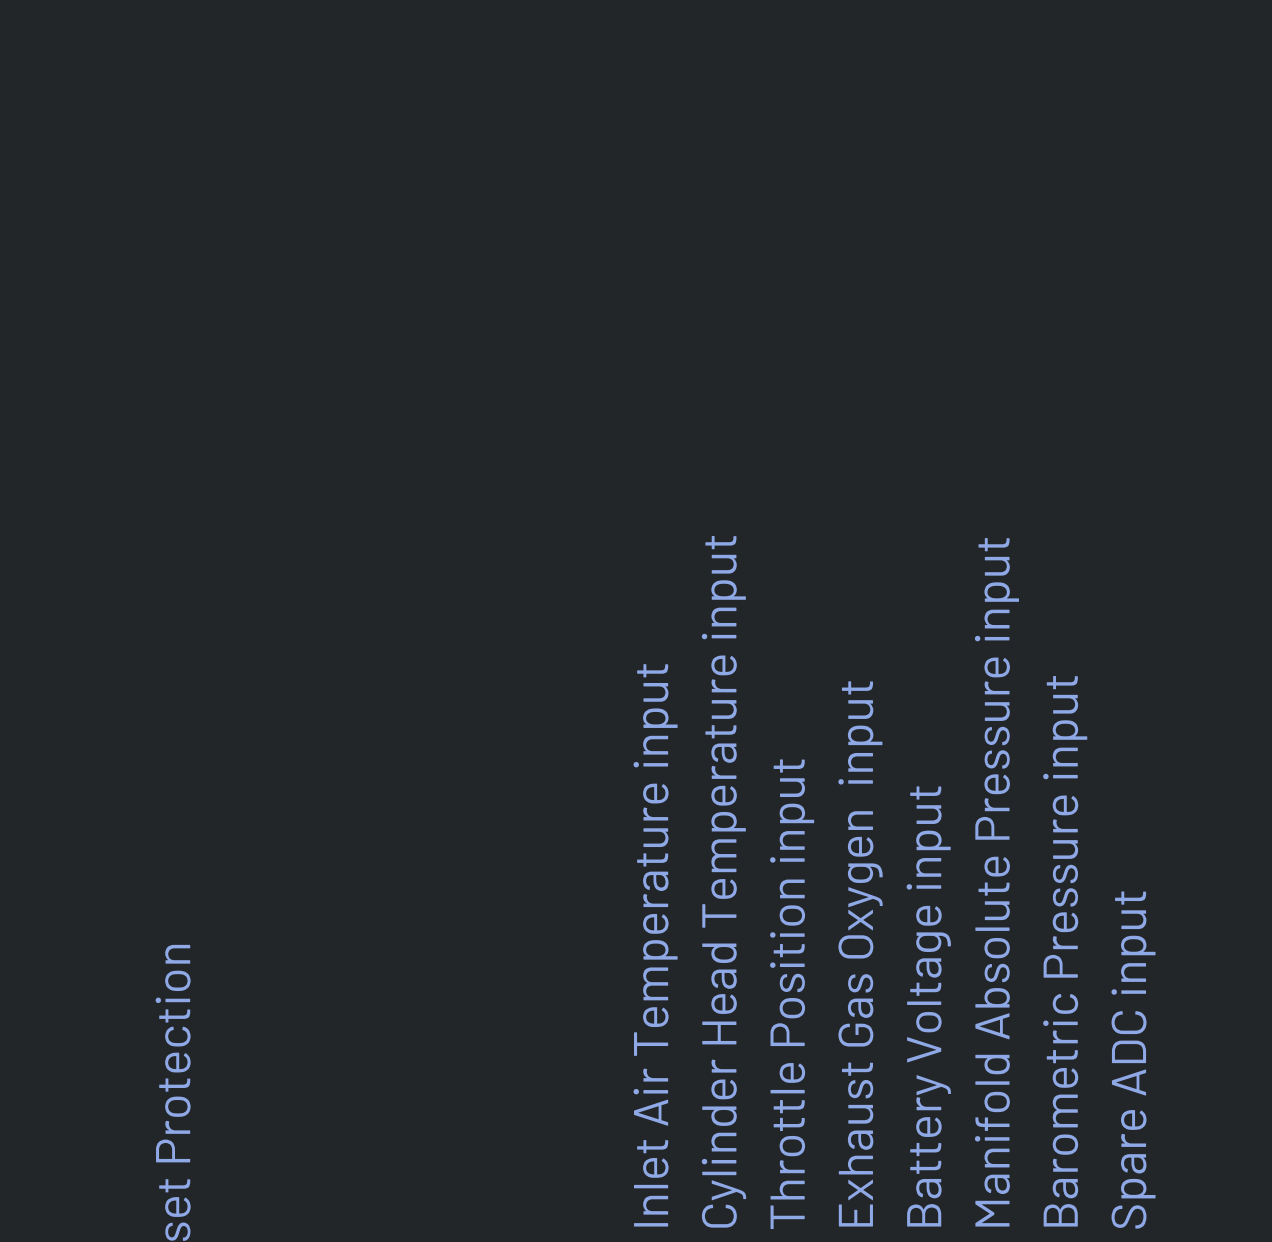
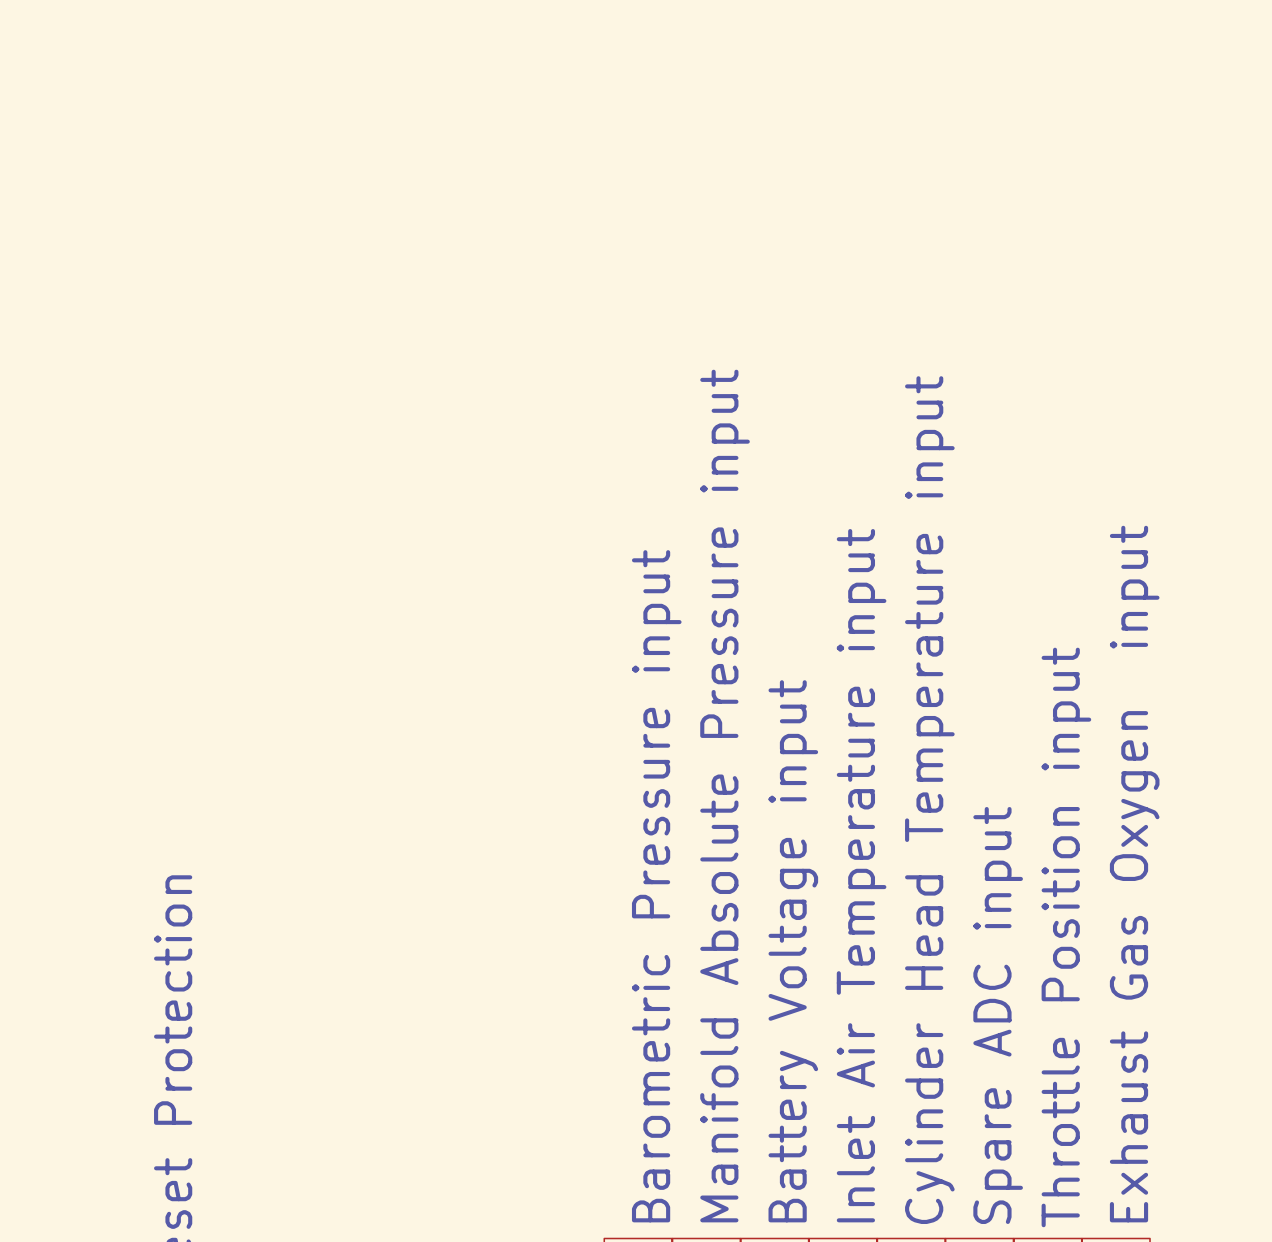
text: Cylinder Head Temperature input (723, 881) -> Manifold Absolute Pressure input (725, 796)
text: Manifold Absolute Pressure input (996, 882) -> Spare ADC input (998, 1015)
text: Inlet Air Temperature input (655, 945) -> Barometric Pressure input (656, 886)
text: Barometric Pressure input (1065, 951) -> Throttle Position input (1066, 937)
text: Exhaust Gas Oxygen input (860, 953) -> Inlet Air Temperature input (861, 875)
text: Throttle Position input (792, 994) -> Battery Voltage input (793, 951)
text: Battery Voltage input (928, 1006) -> Cylinder Head Temperature input (929, 800)
text: Spare ADC input (1133, 1060) -> Exhaust Gas Oxygen input (1134, 874)

